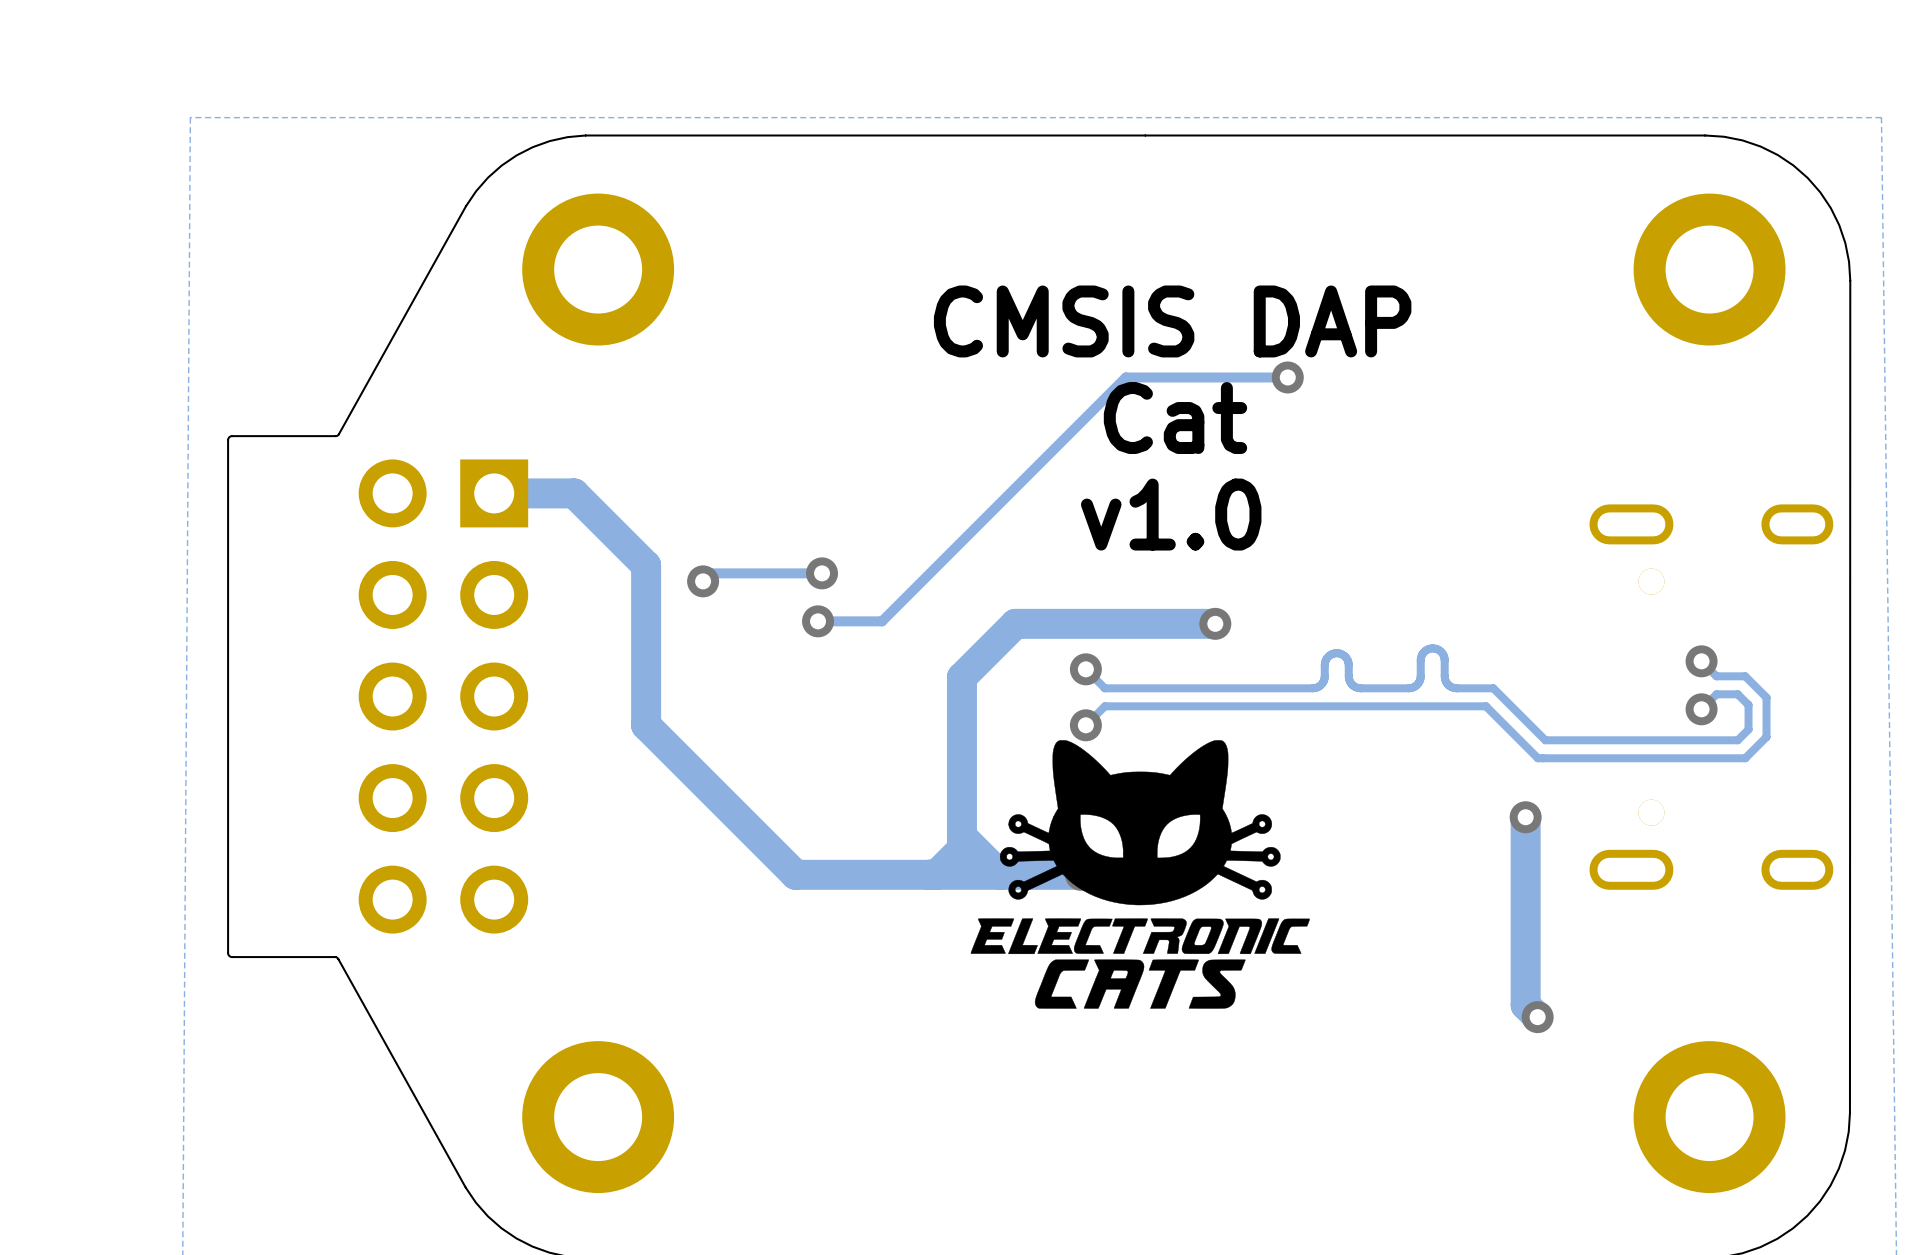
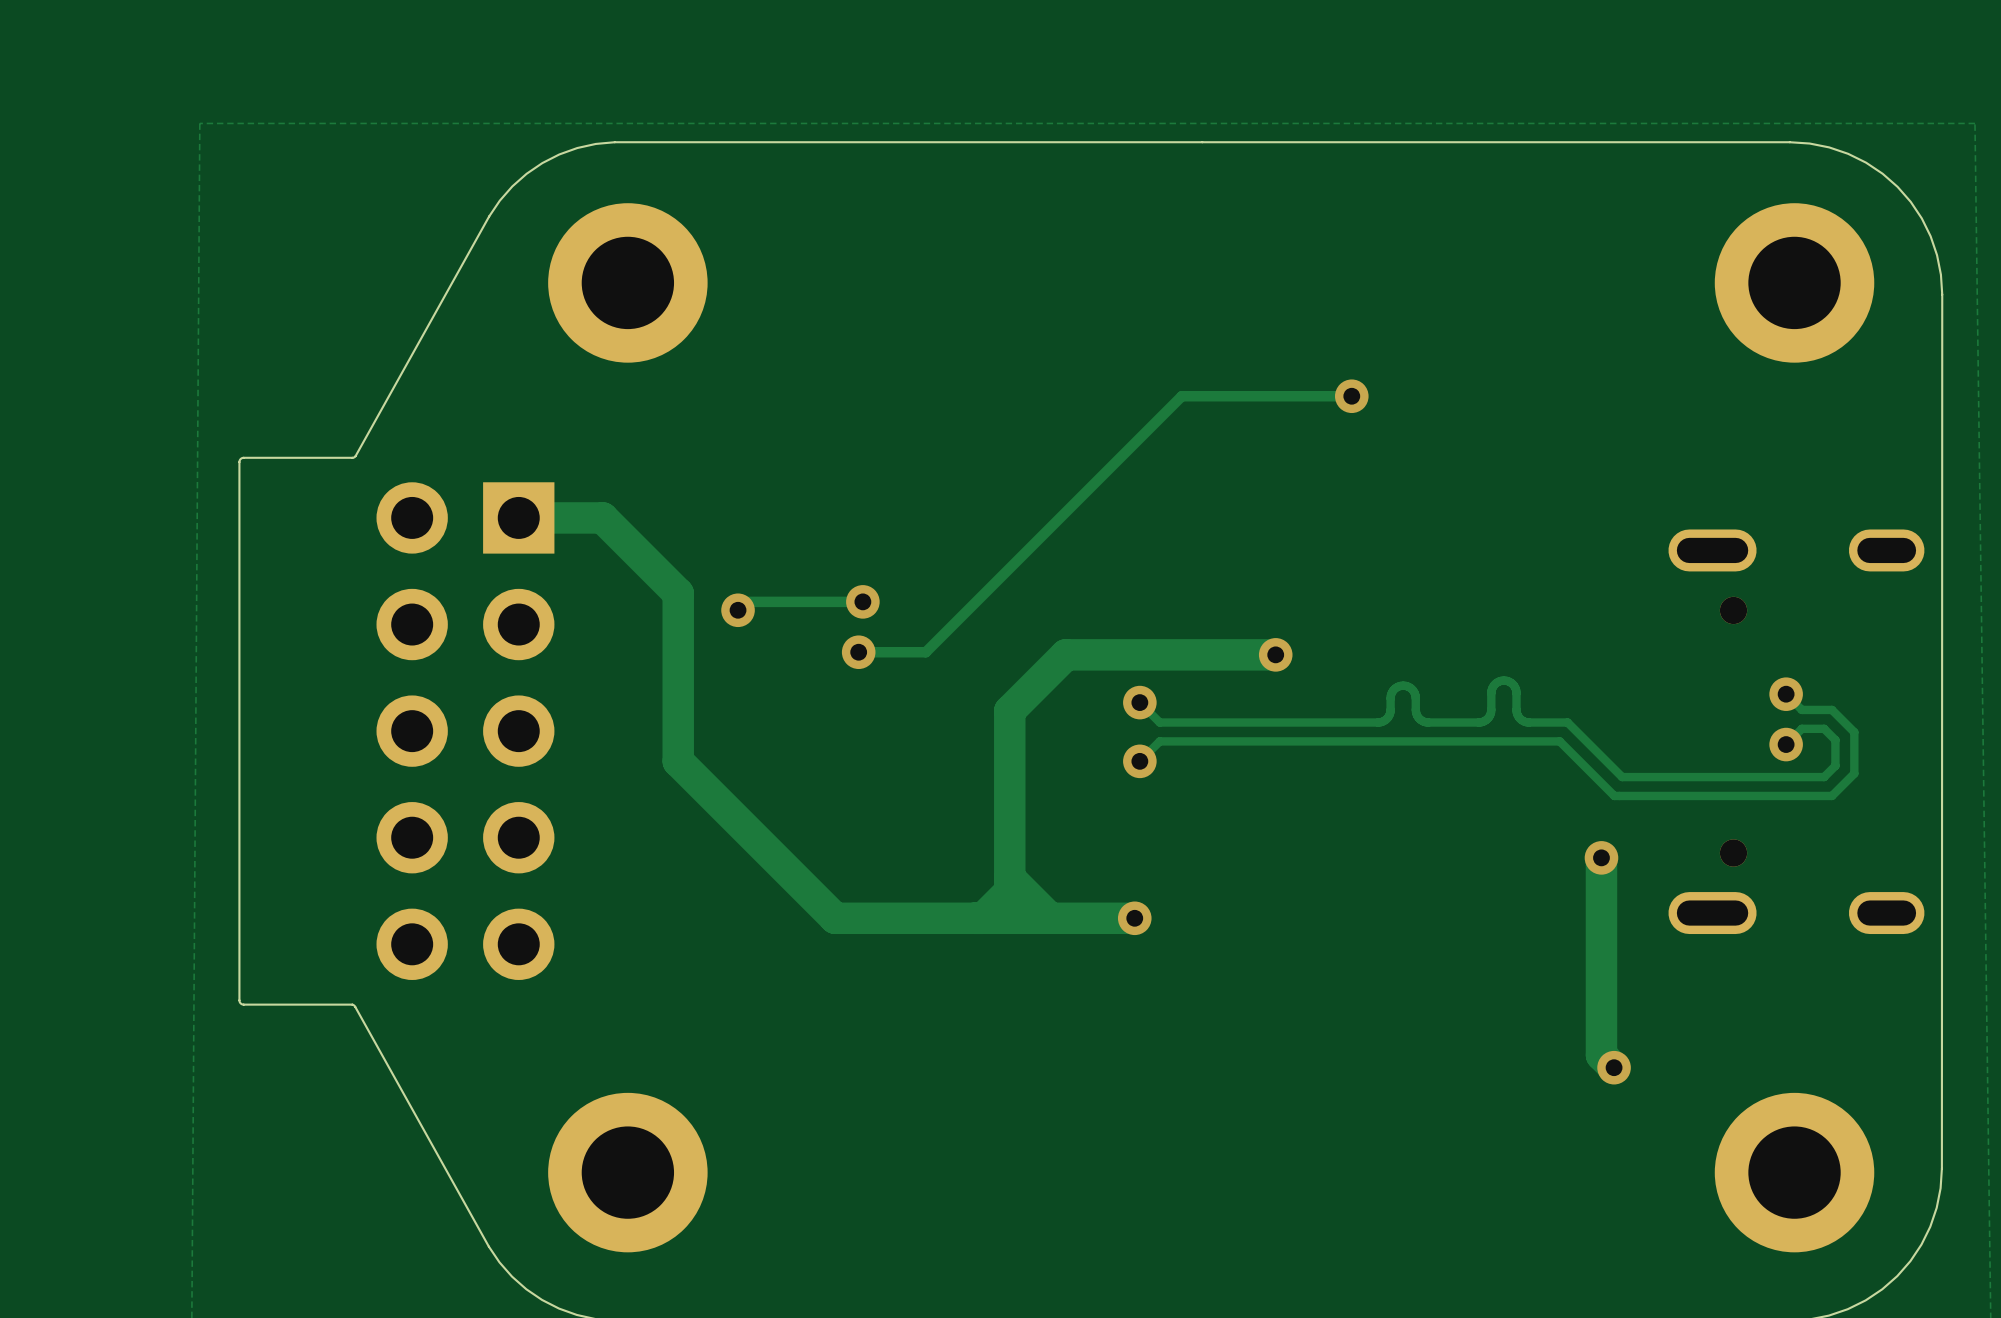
text: CMSIS DAP (1172, 321) -> none
text: Cat (1175, 418) -> none
text: v1.0 (1171, 514) -> none
drawing: [970, 740, 1310, 1009] -> none

